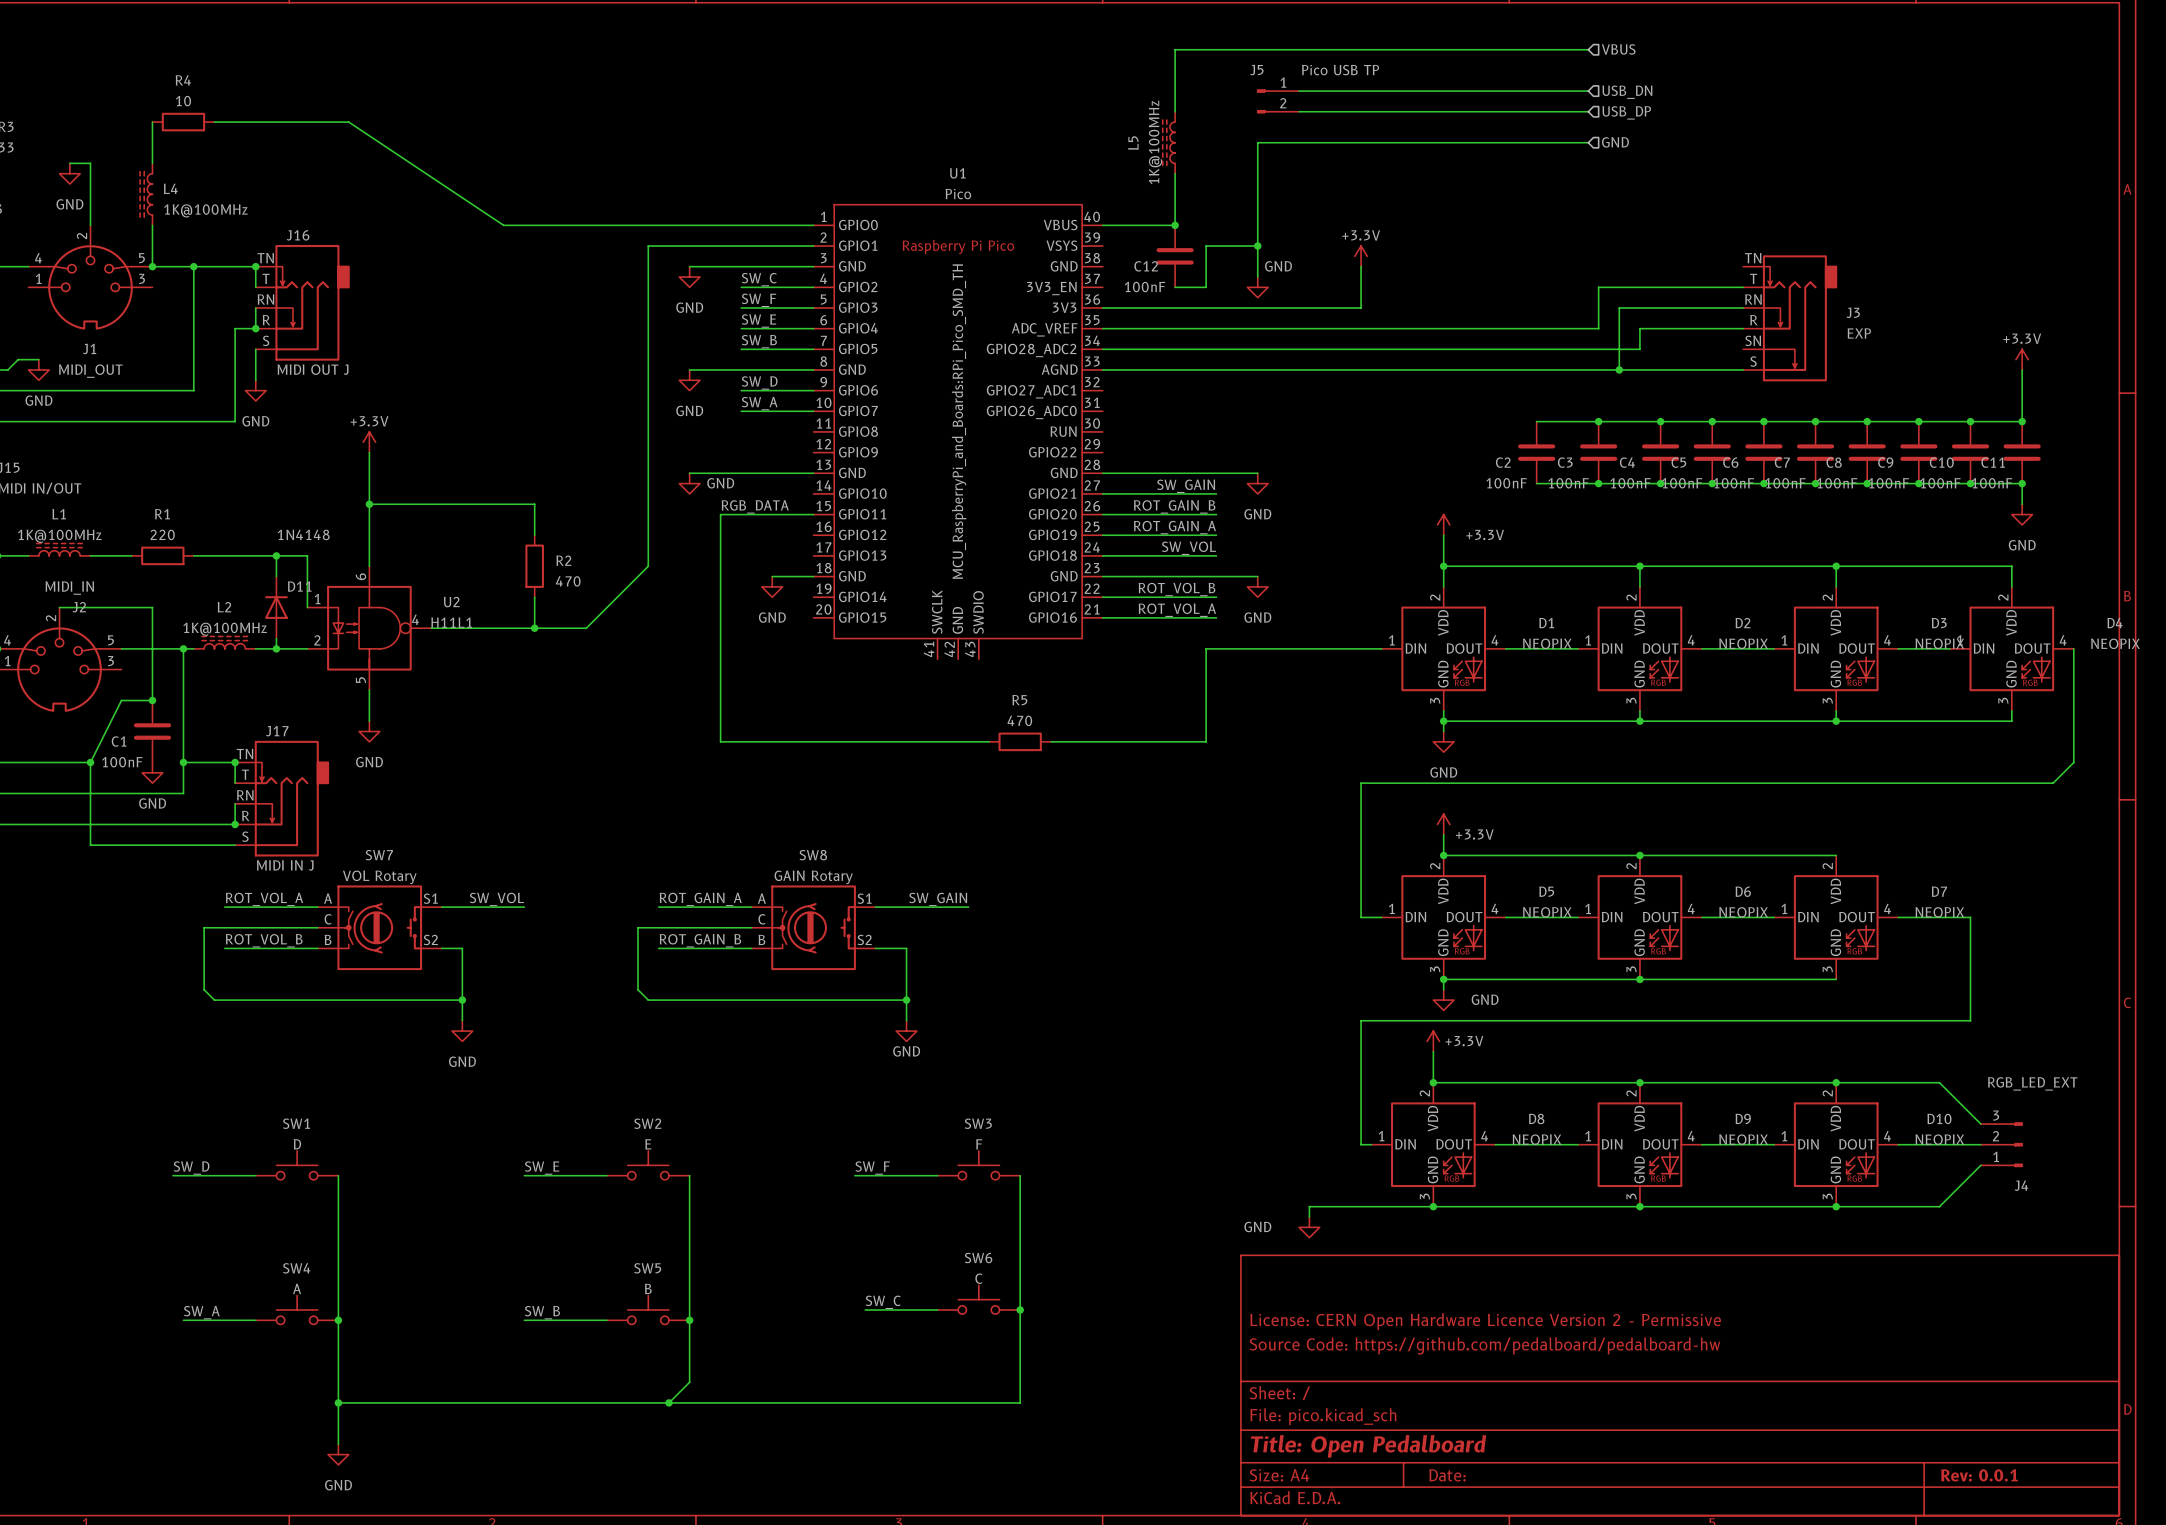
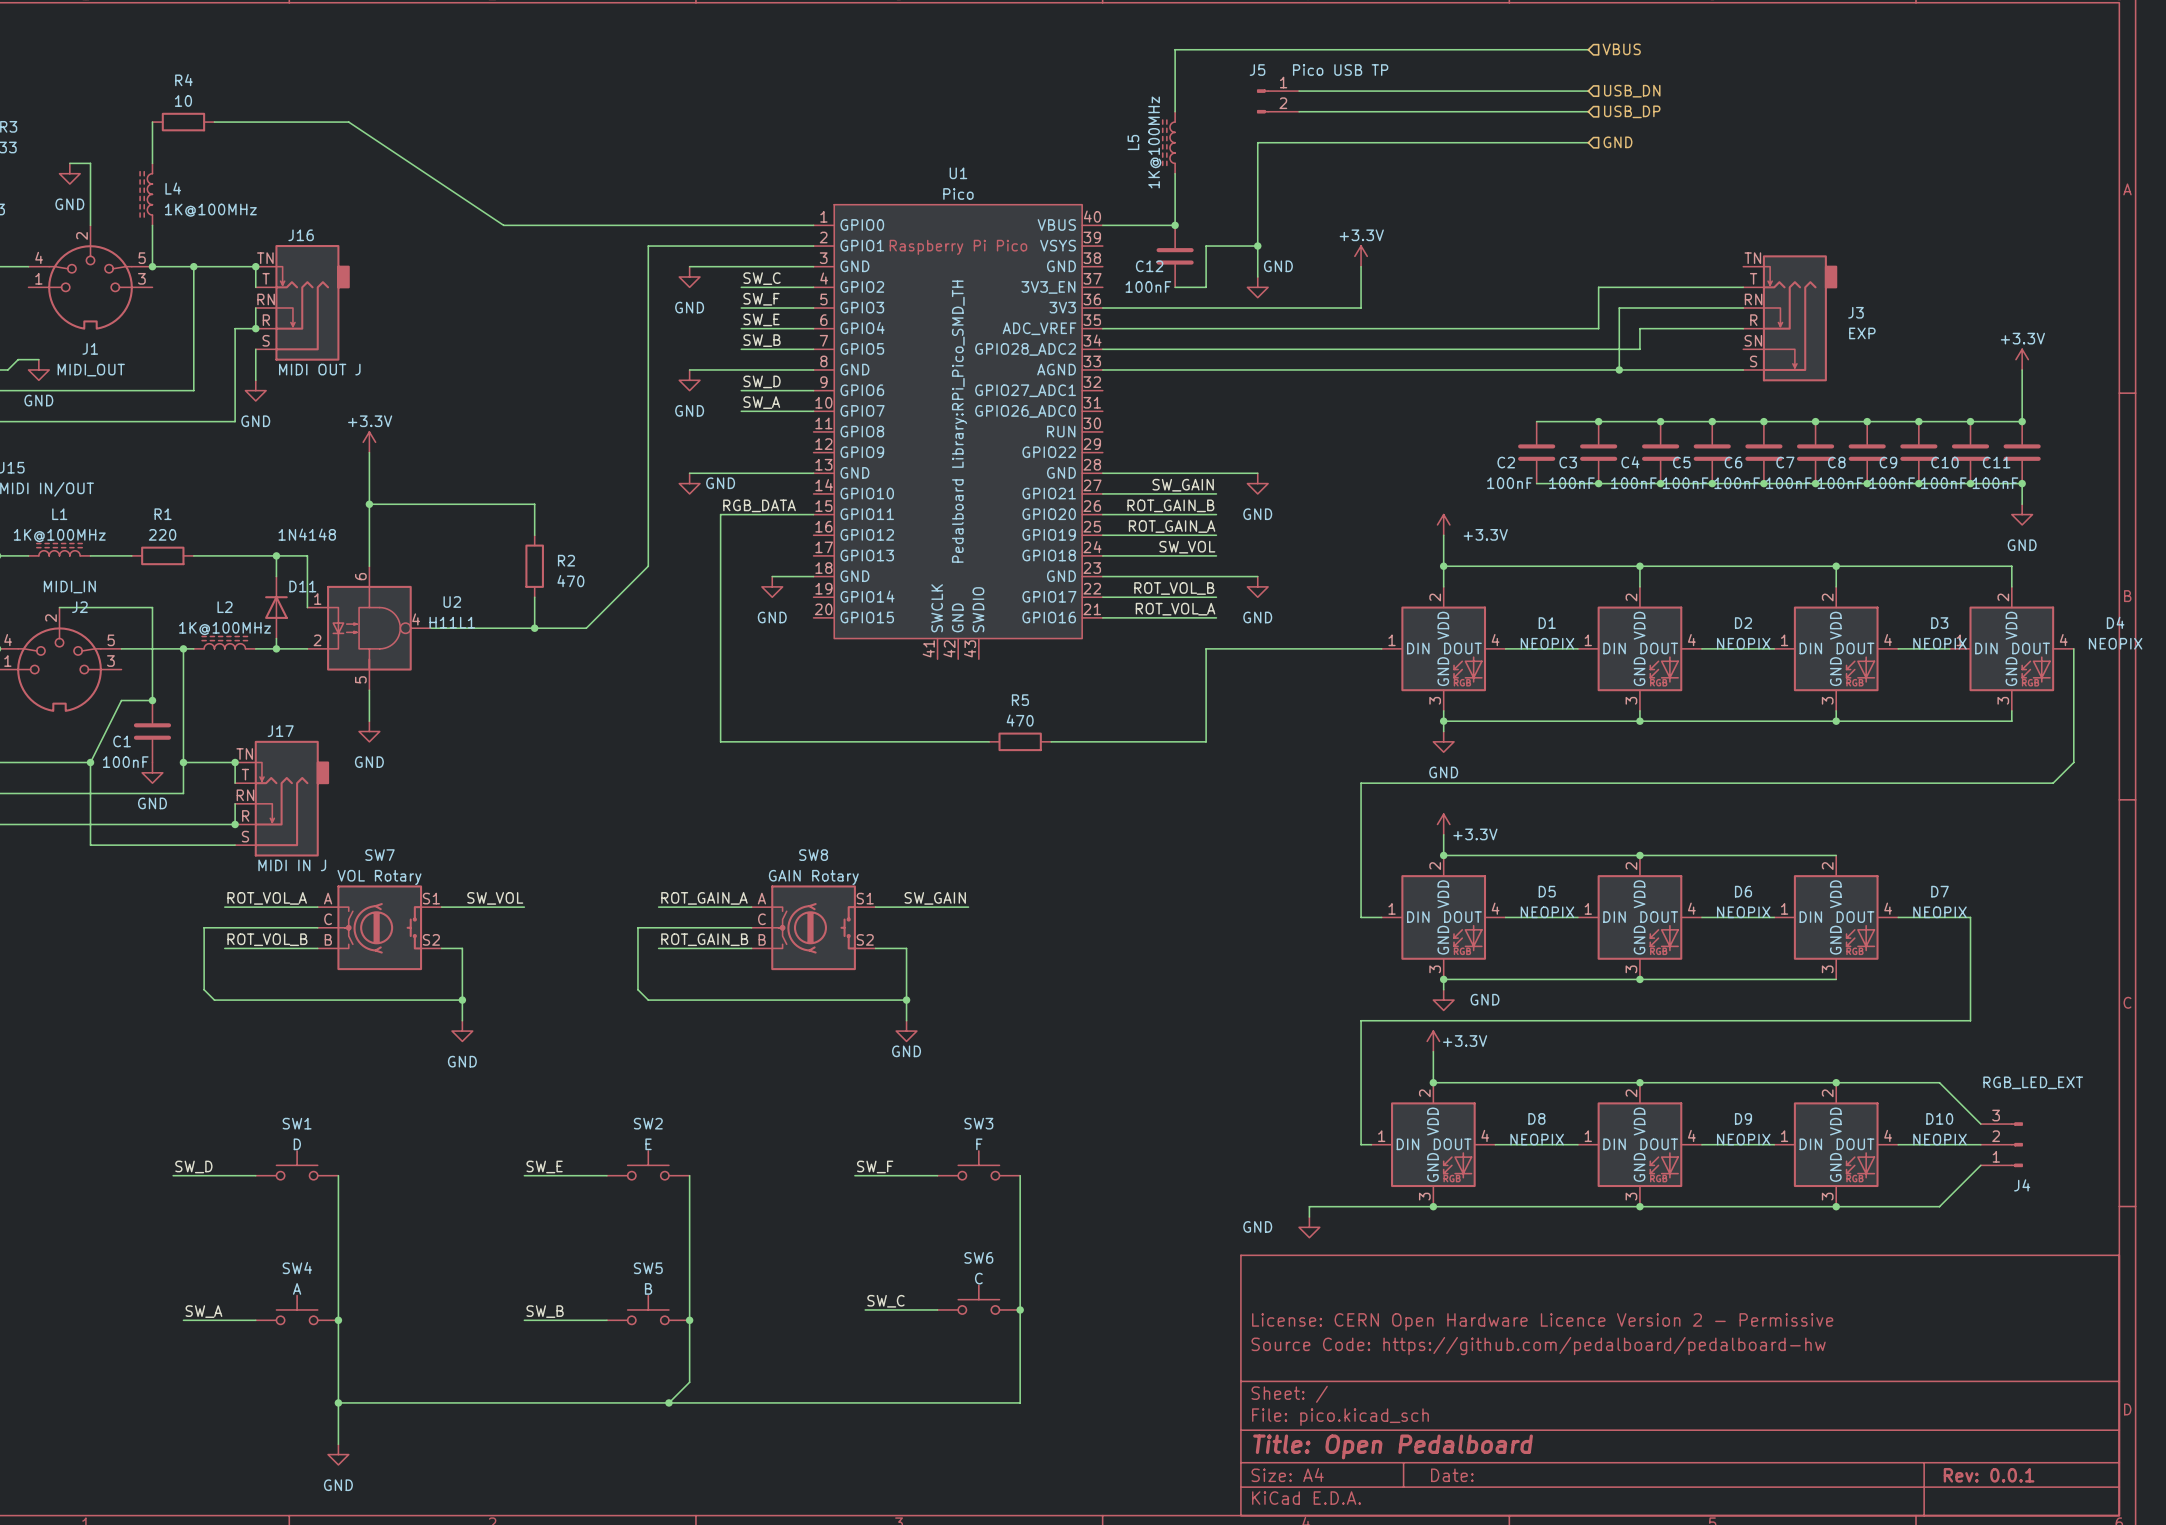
U1 text: MCU_RaspberryPi_and_Boards:RPi_Pico_SMD_TH (959, 421) -> Pedalboard Library:RPi_Pico_SMD_TH (959, 421)

